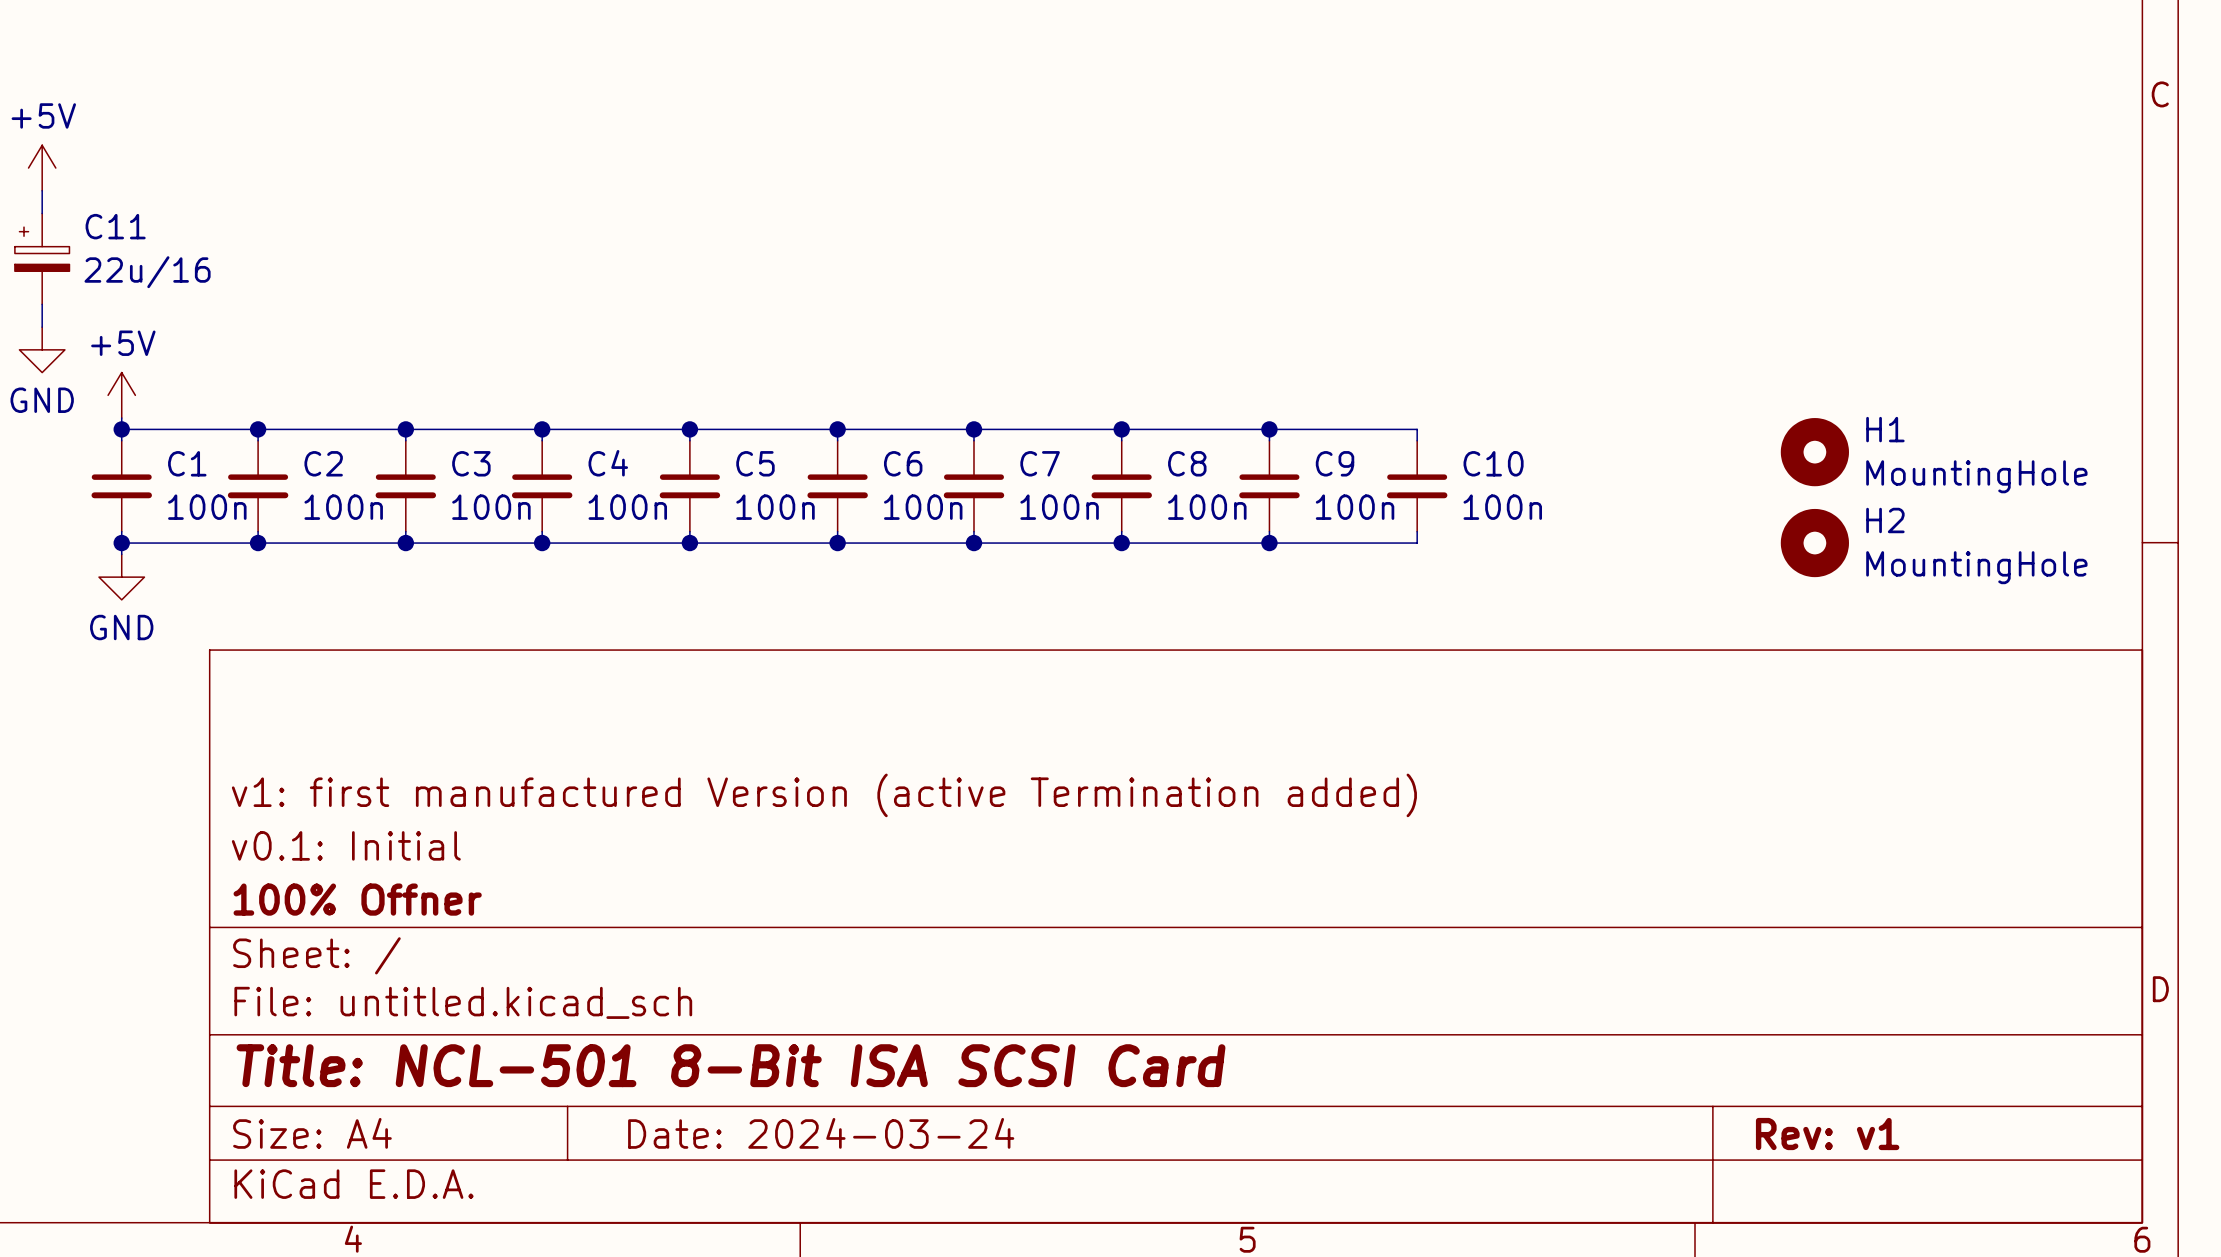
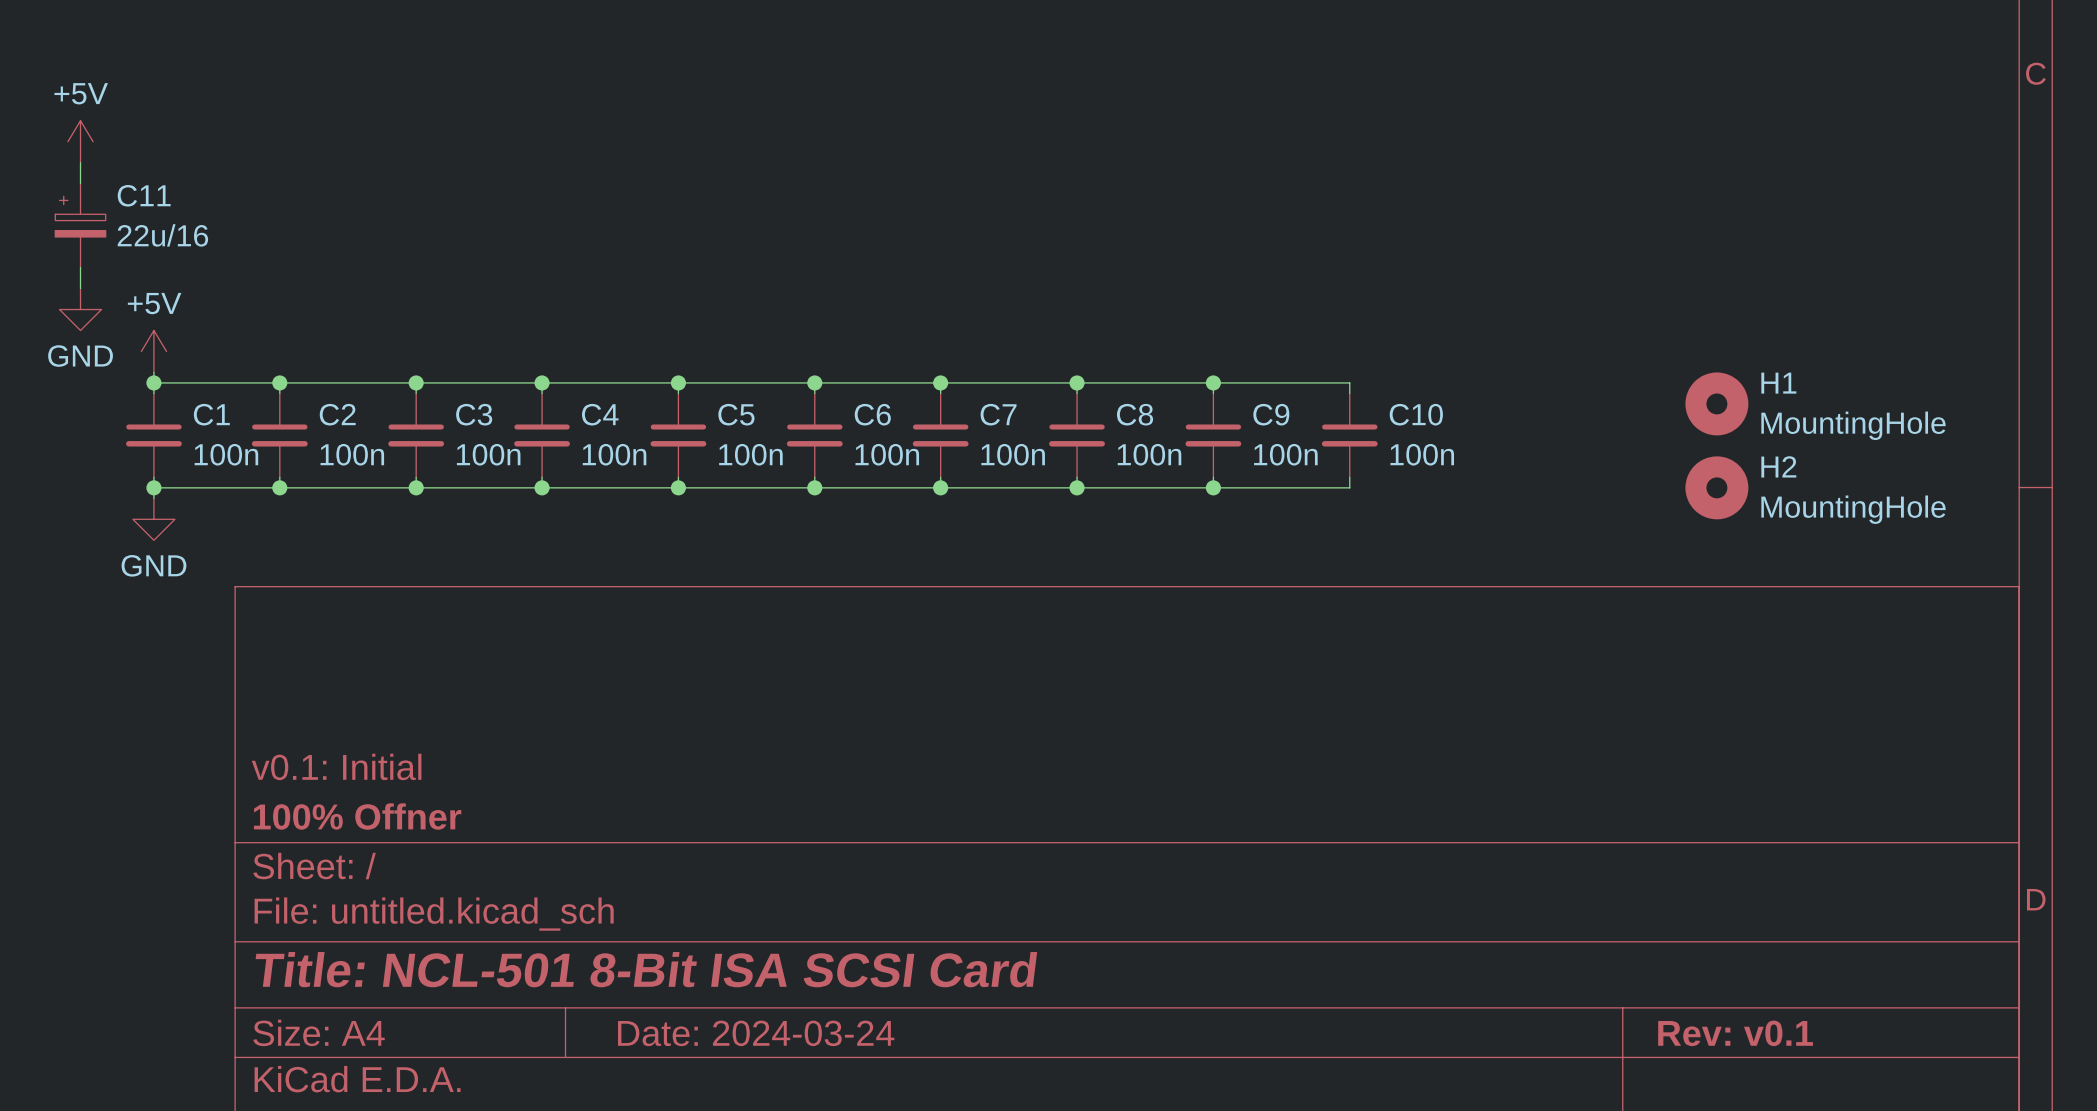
title block: v1: first manufactured Version (active Termination added) (824, 795) -> none
title block: Rev: v1 (1827, 1134) -> Rev: v0.1 (1735, 1033)

